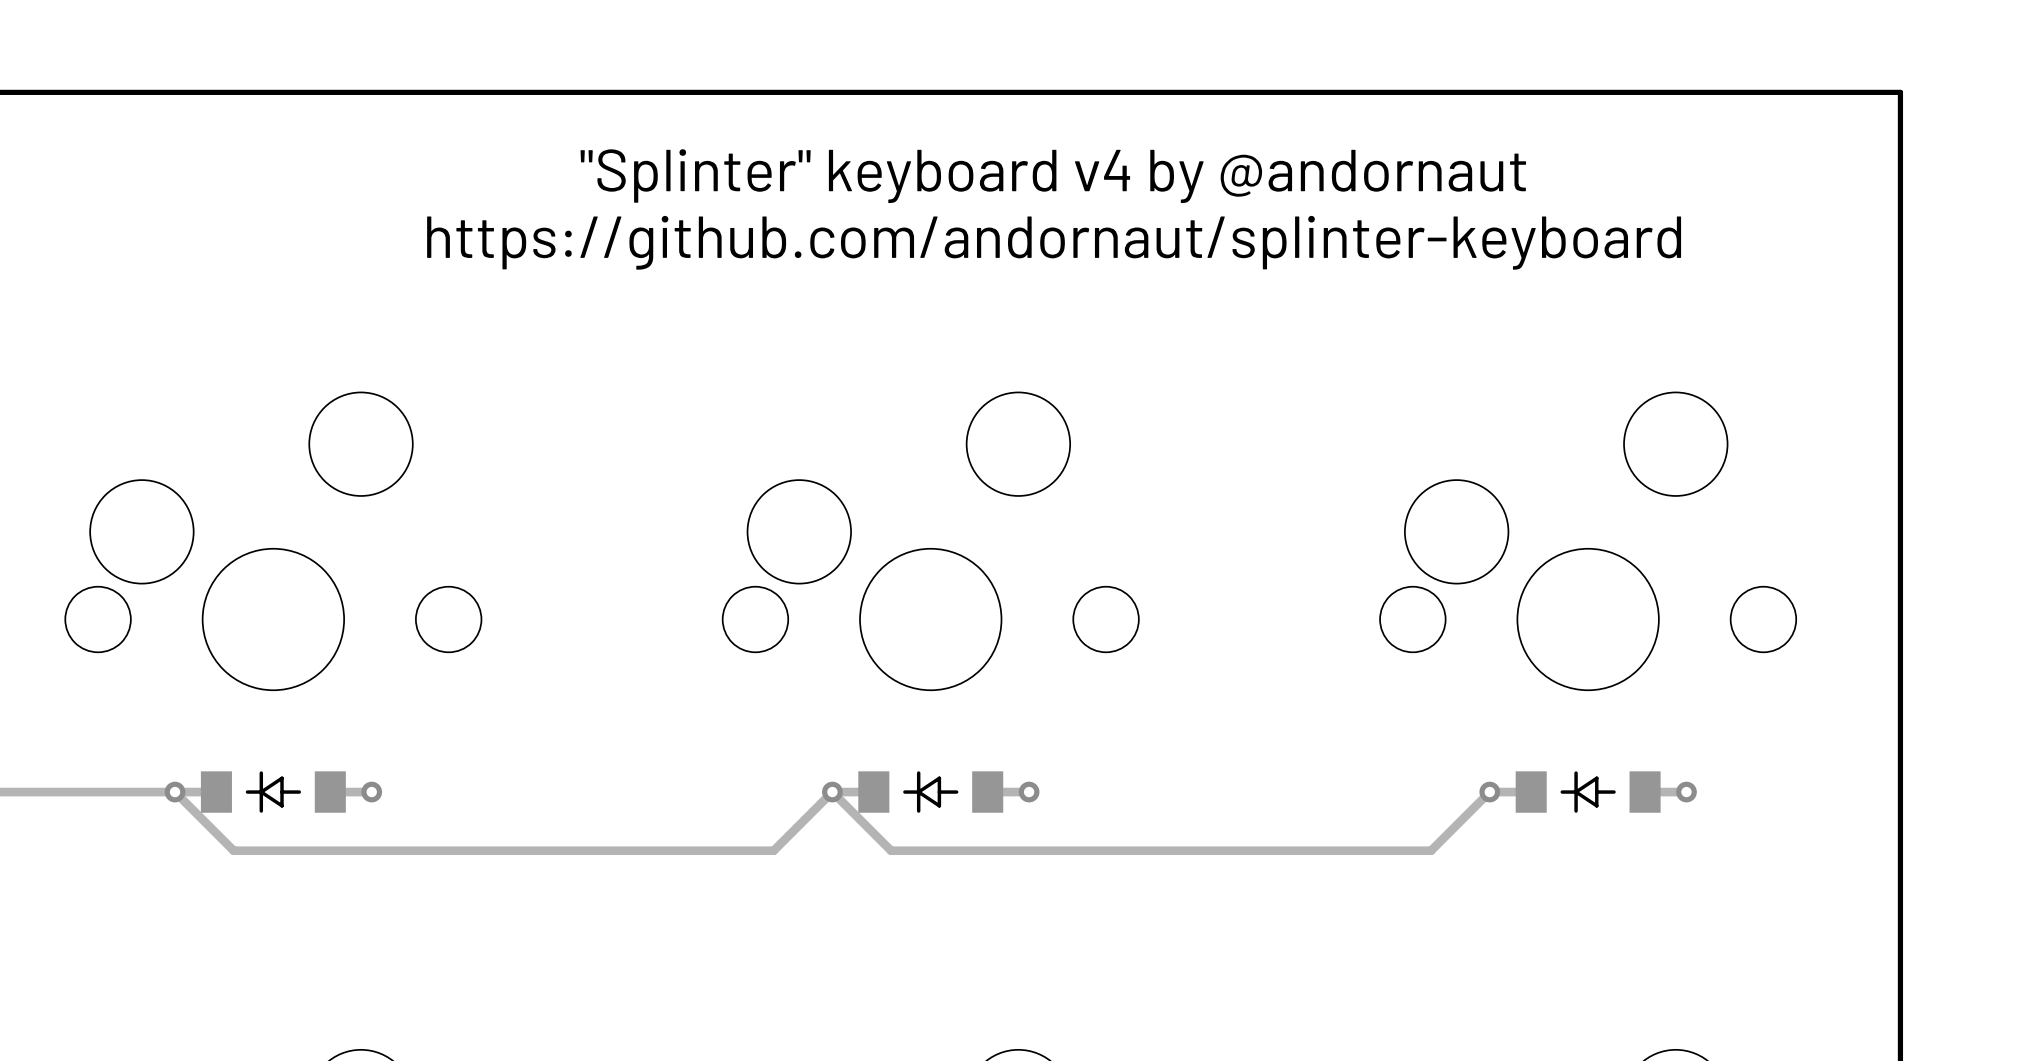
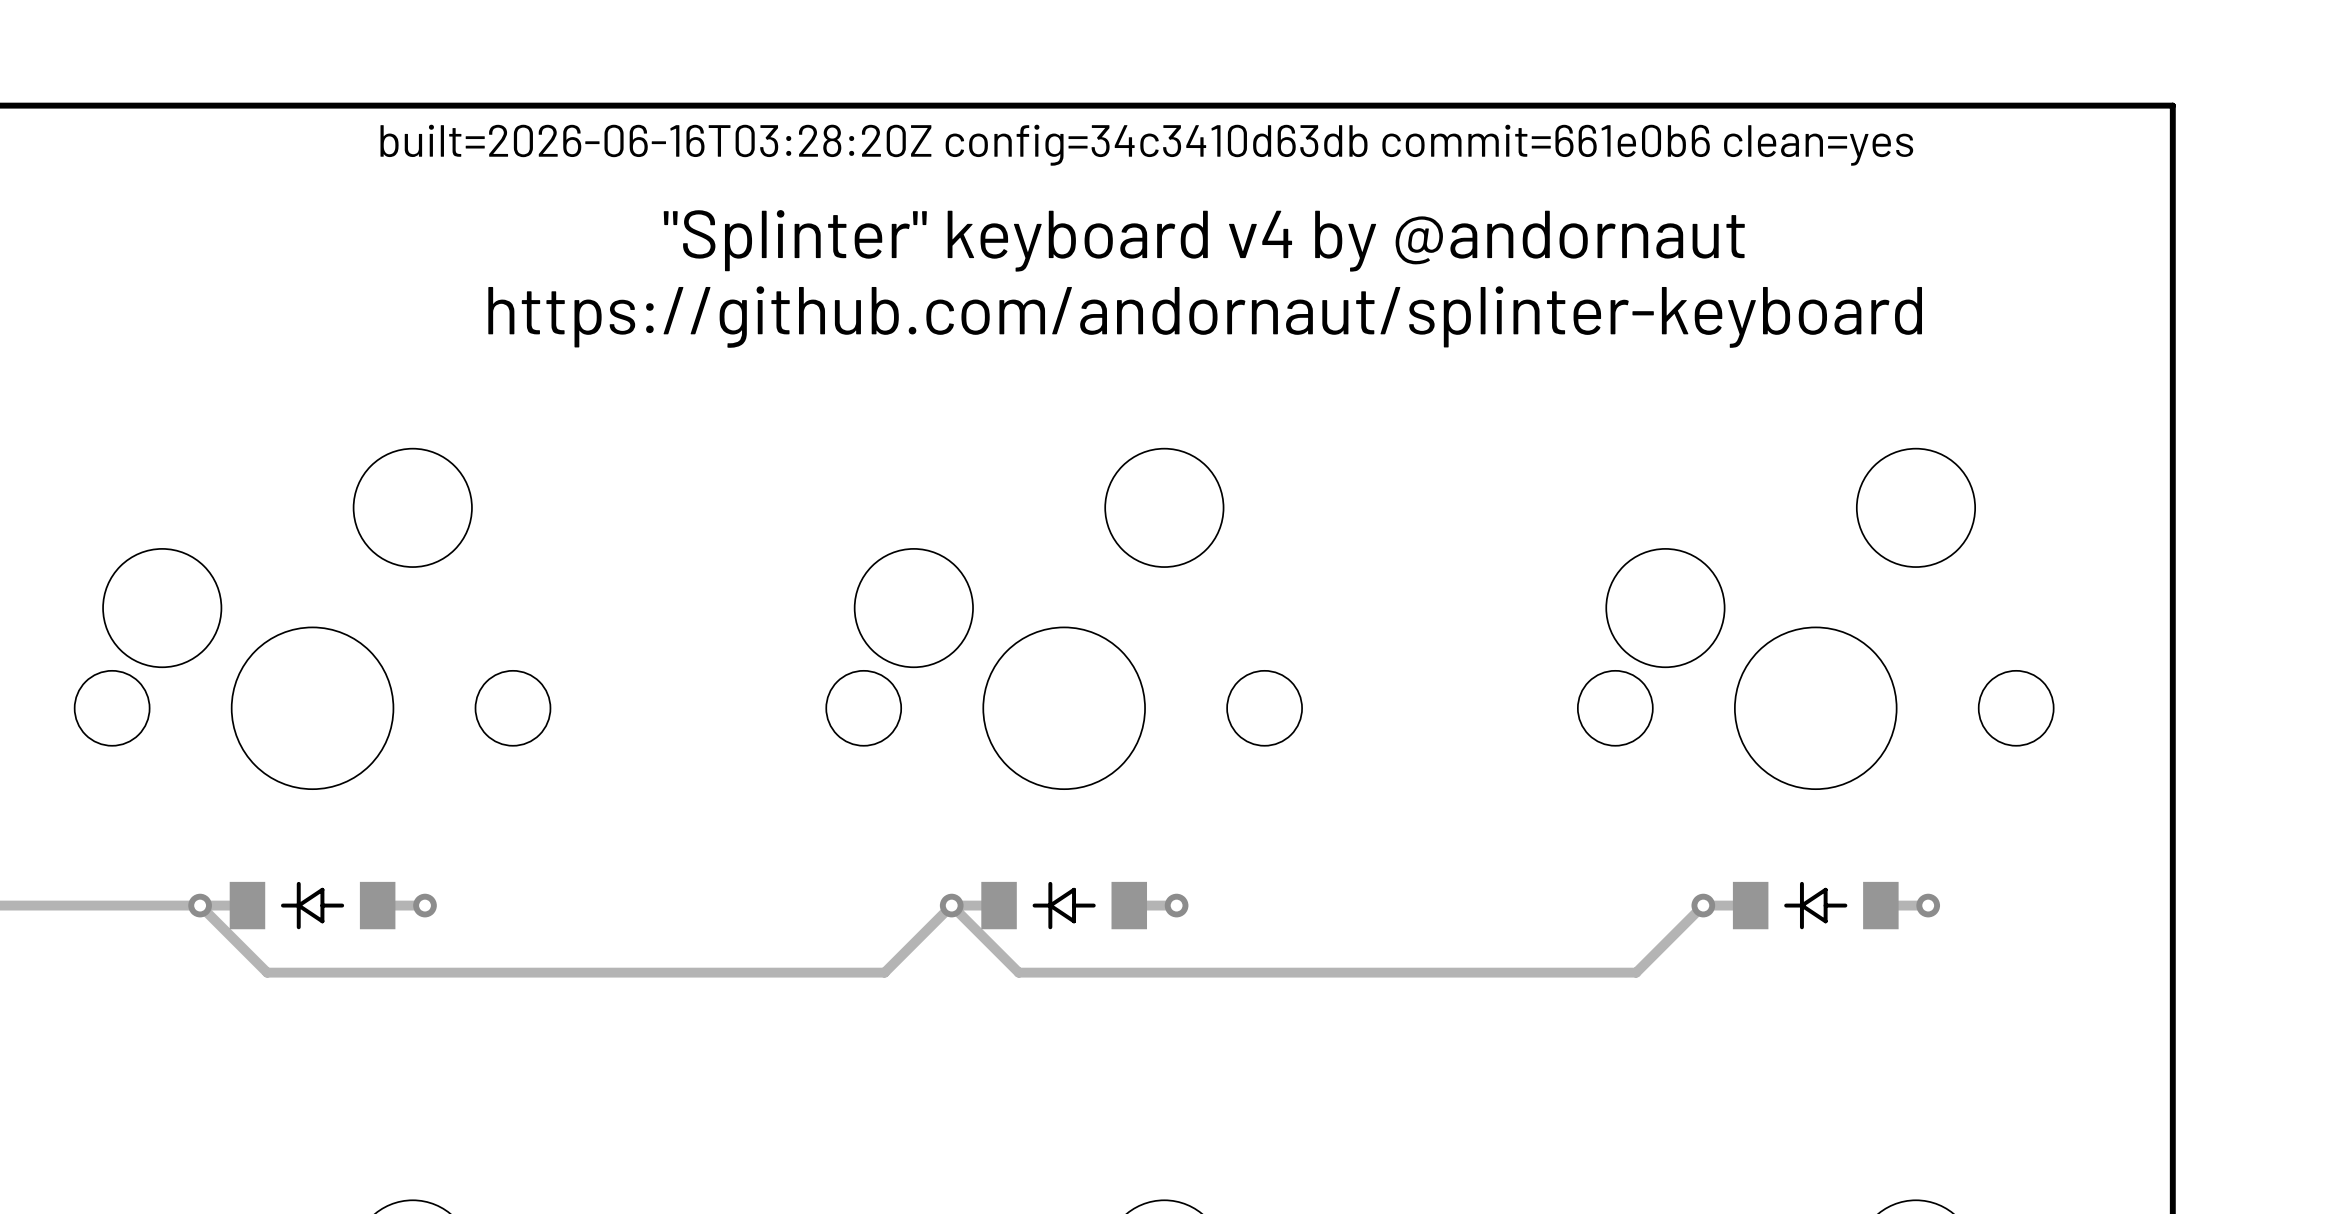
text: none -> built=2026-06-16T03:28:20Z config=34c3410d63db commit=661e0b6 clean=yes (1146, 145)
text position: "Splinter" keyboard v4 by @andornaut (1053, 176) -> "Splinter" keyboard v4 by @andornaut (1204, 240)
text position: https://github.com/andornaut/splinter-keyboard (1054, 242) -> https://github.com/andornaut/splinter-keyboard (1205, 317)

